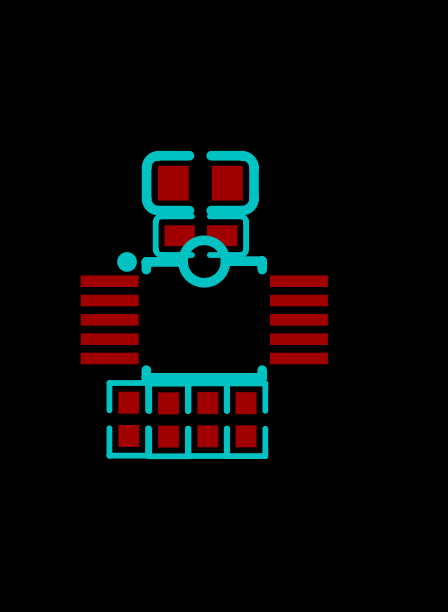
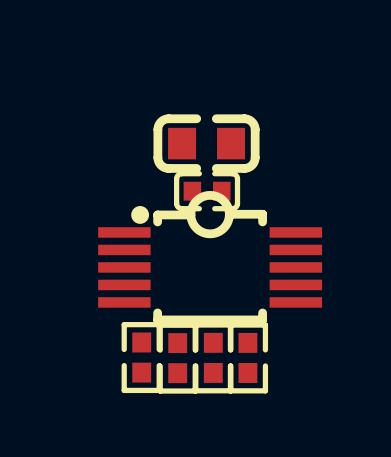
part footprint: [152, 213, 249, 258] -> [173, 171, 241, 212]

